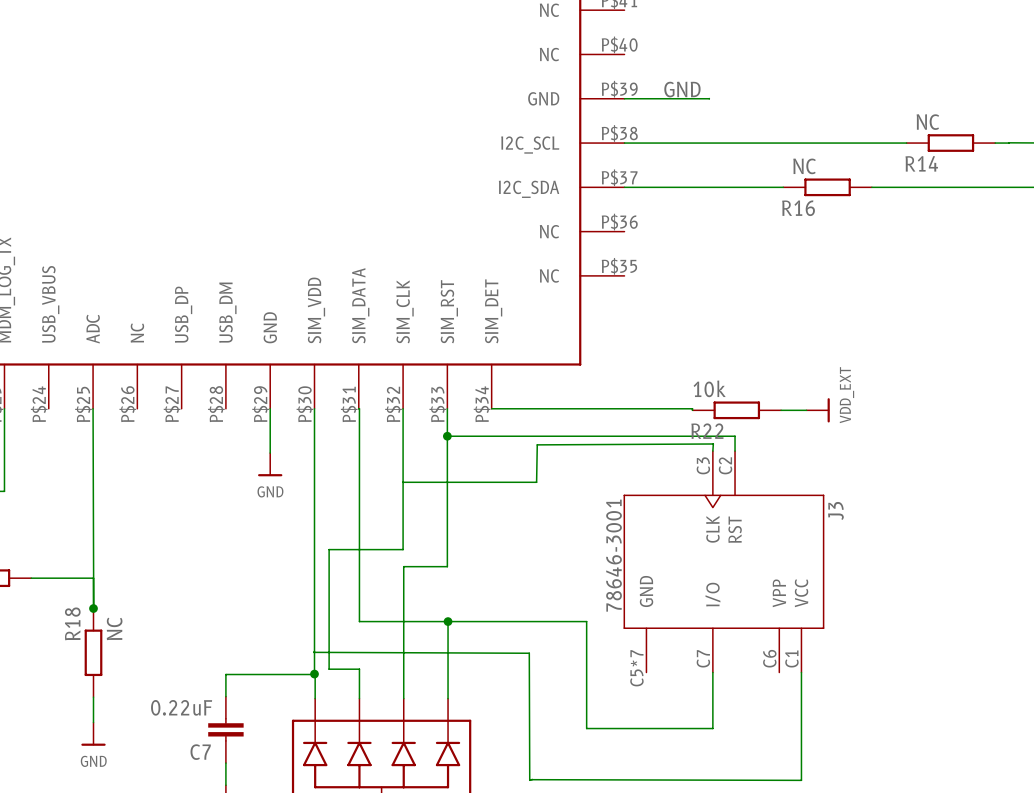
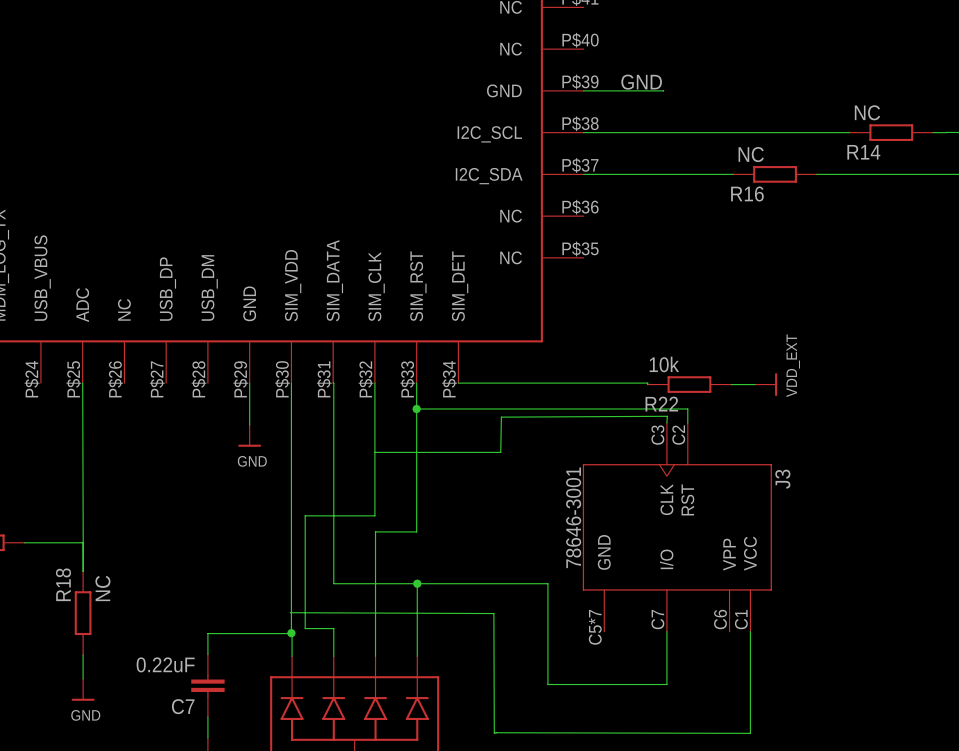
junction: (93, 608) -> none

